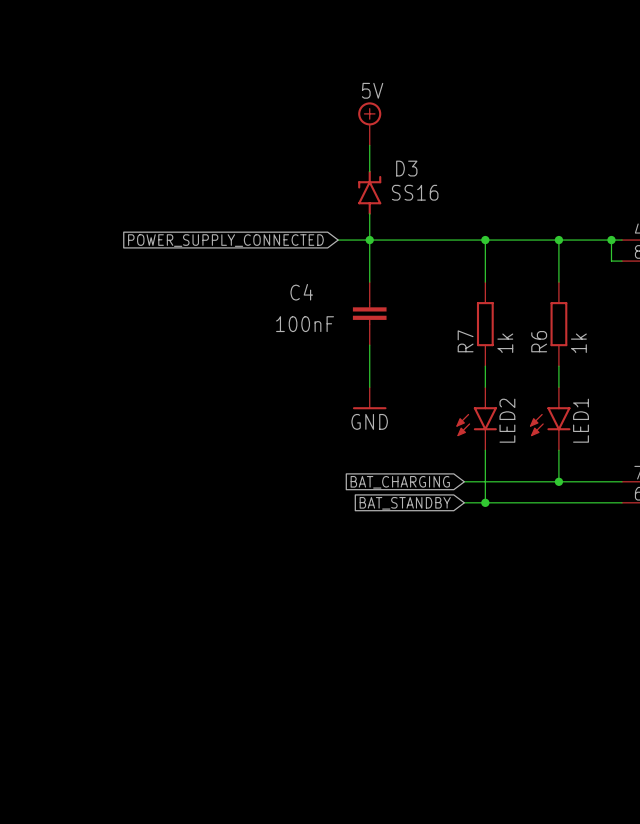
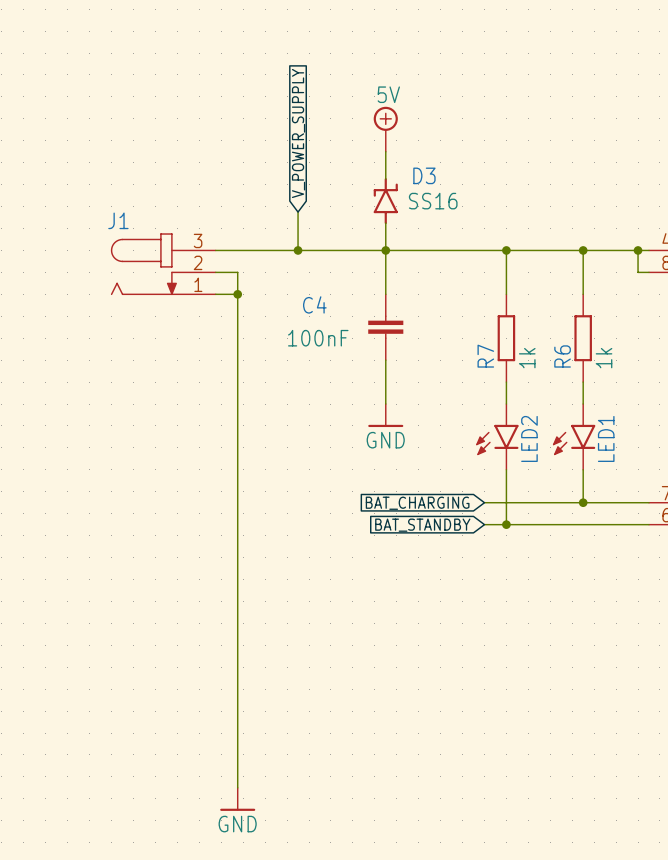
global label: none -> V_POWER_SUPPLY (298, 133)
wire: none -> (298, 212) (298, 250)
wire: none -> (215, 250) (352, 250)
global label: POWER_SUPPLY_CONNECTED (225, 240) -> none
junction: none -> (298, 250)
J1: none -> (163, 264)
wire: none -> (215, 272) (237, 272) (237, 787)
wire: none -> (215, 294) (237, 294)
junction: none -> (237, 294)
power symbol: none -> GND (237, 799)

